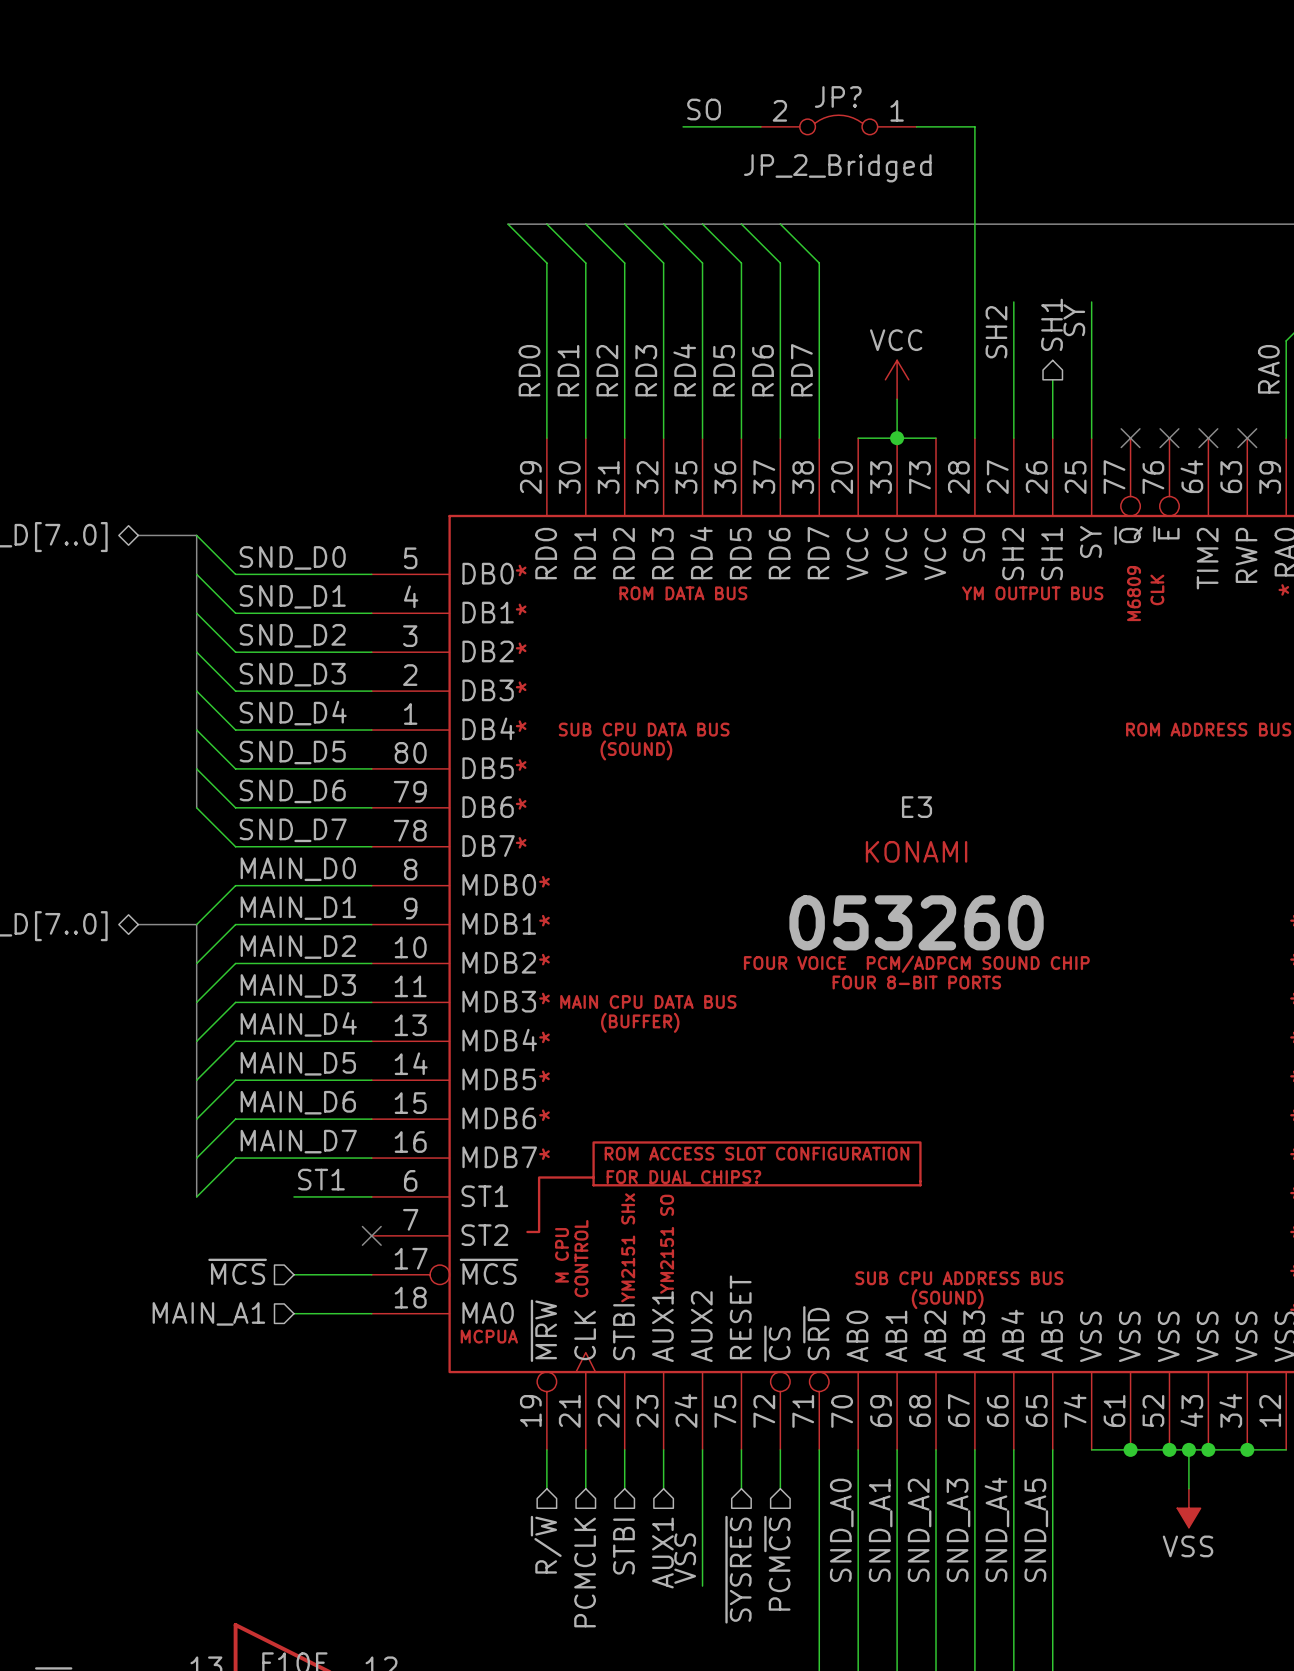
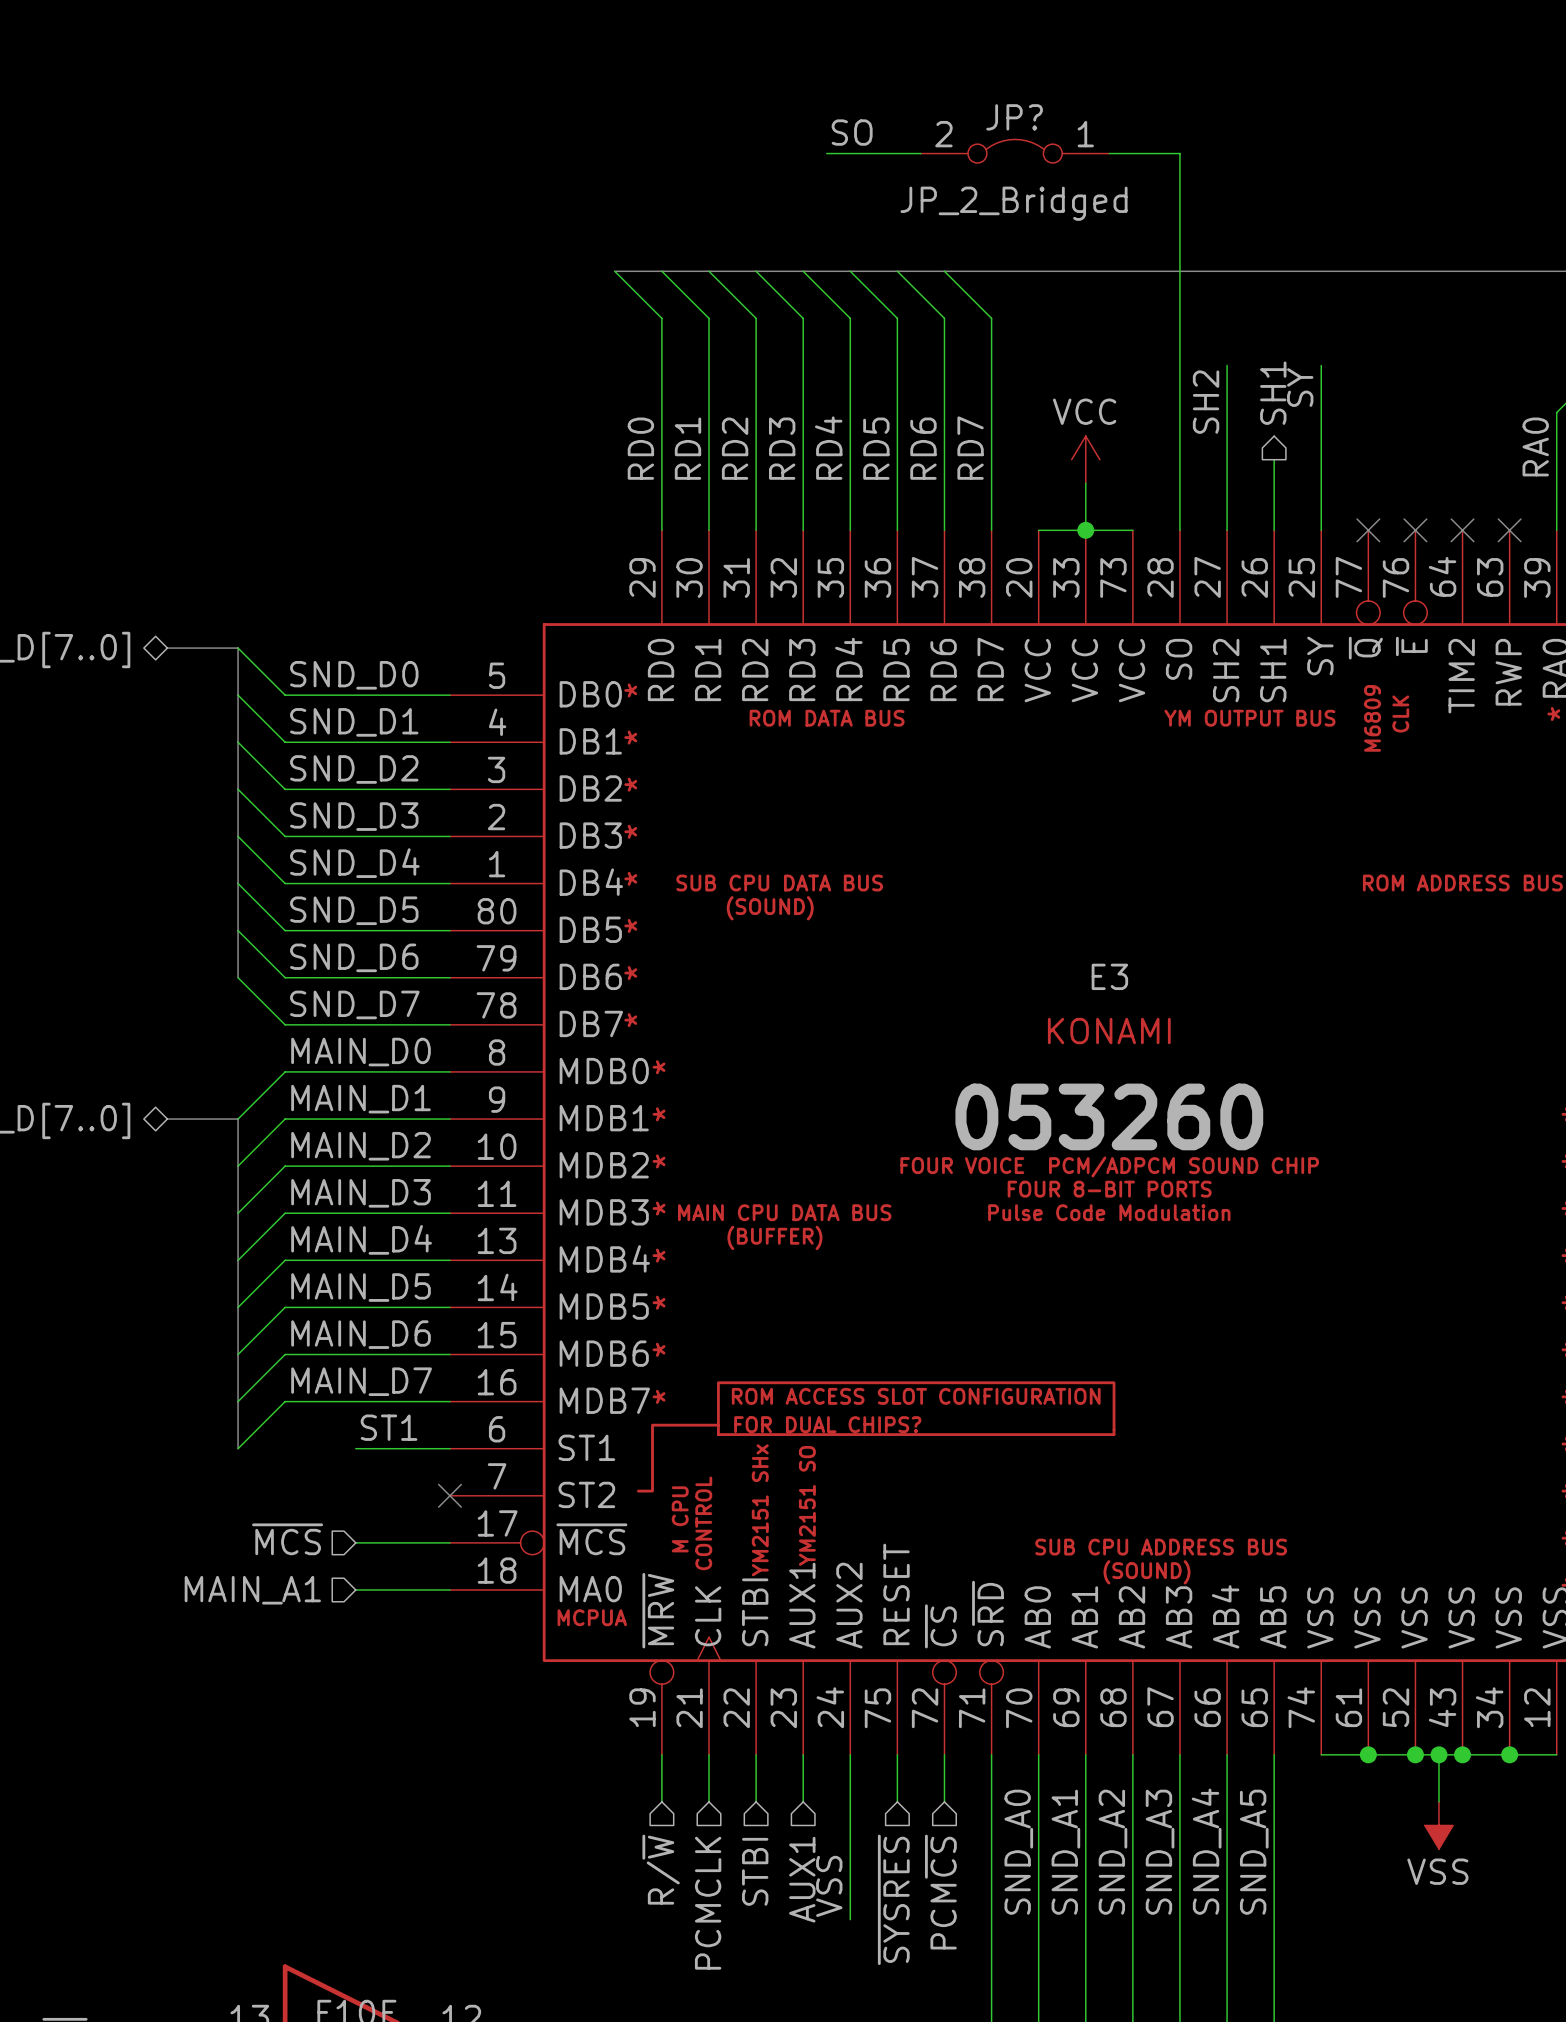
E3 text: none -> Pulse Code Modulation (1109, 1212)

